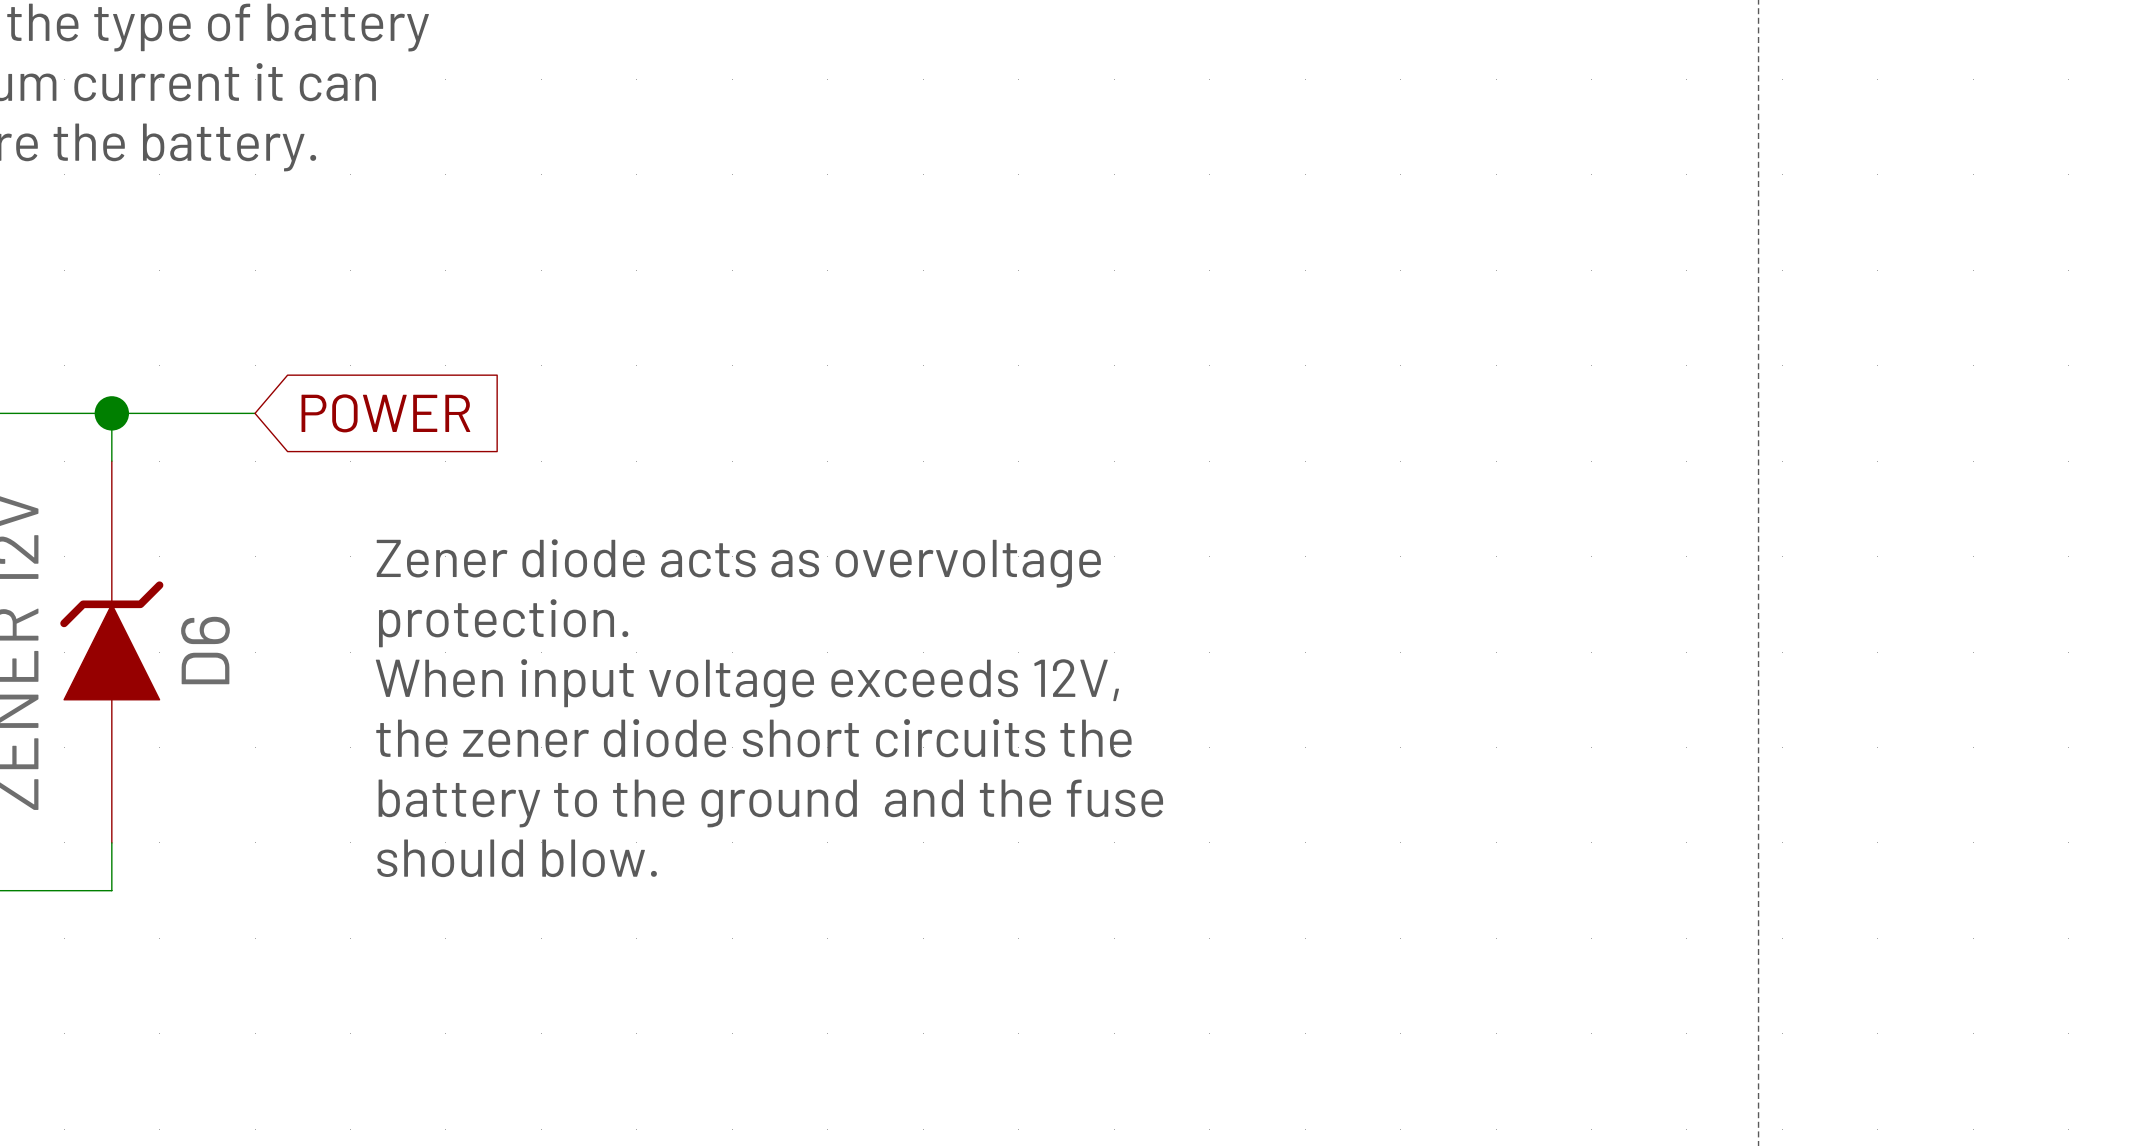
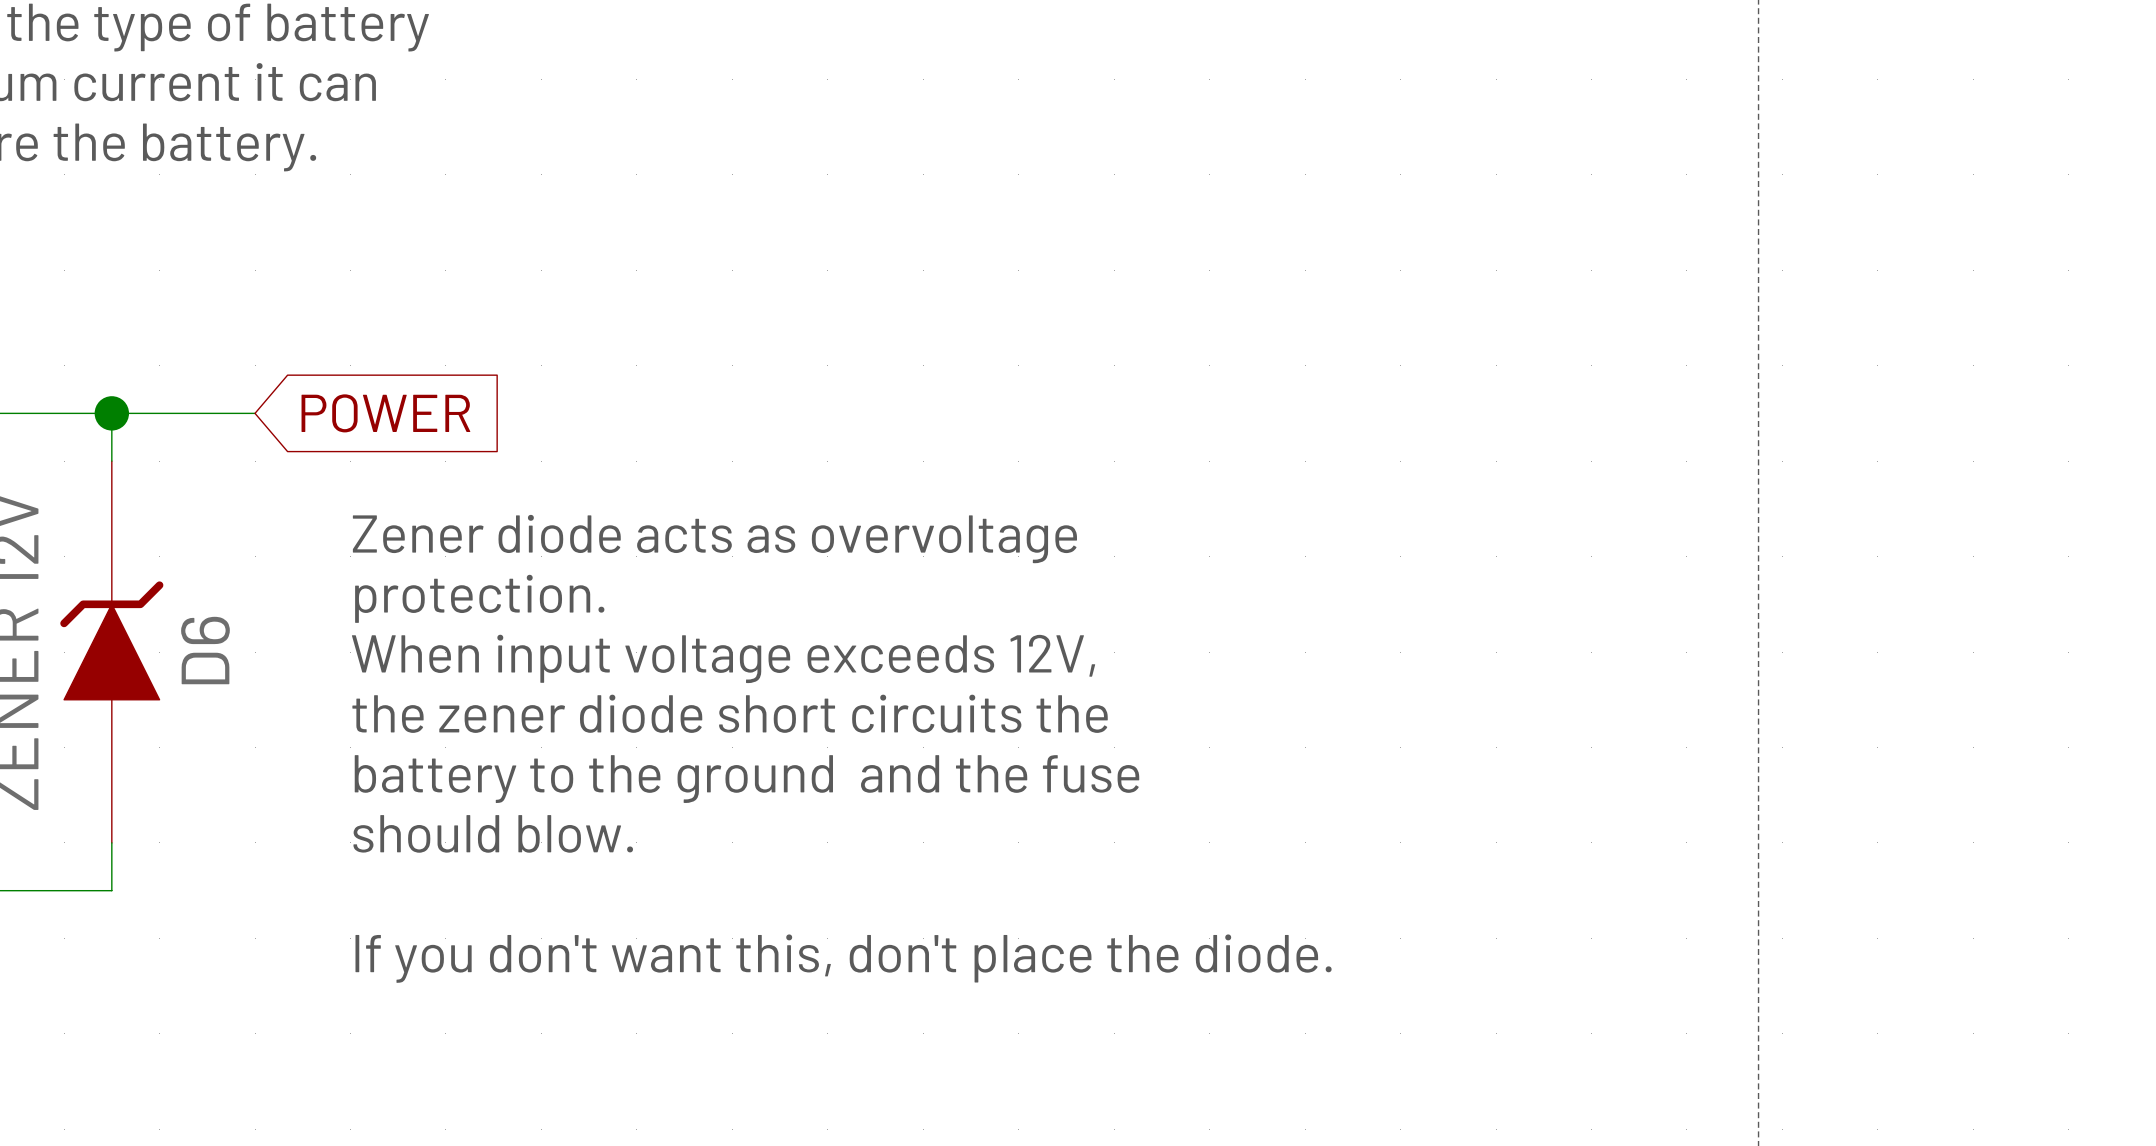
text position: Zener diode acts as overvoltage (738, 563) -> Zener diode acts as overvoltage (714, 539)
text position: protection. (503, 623) -> protection. (479, 598)
text position: When input voltage exceeds 12V, (747, 683) -> When input voltage exceeds 12V, (723, 658)
text position: the zener diode short circuits the (753, 738) -> the zener diode short circuits the (730, 713)
text position: battery to the ground and the fuse (770, 803) -> battery to the ground and the fuse (746, 779)
text position: should blow. (517, 858) -> should blow. (493, 833)
text: none -> If you don't want this, don't place the diode. (843, 958)

